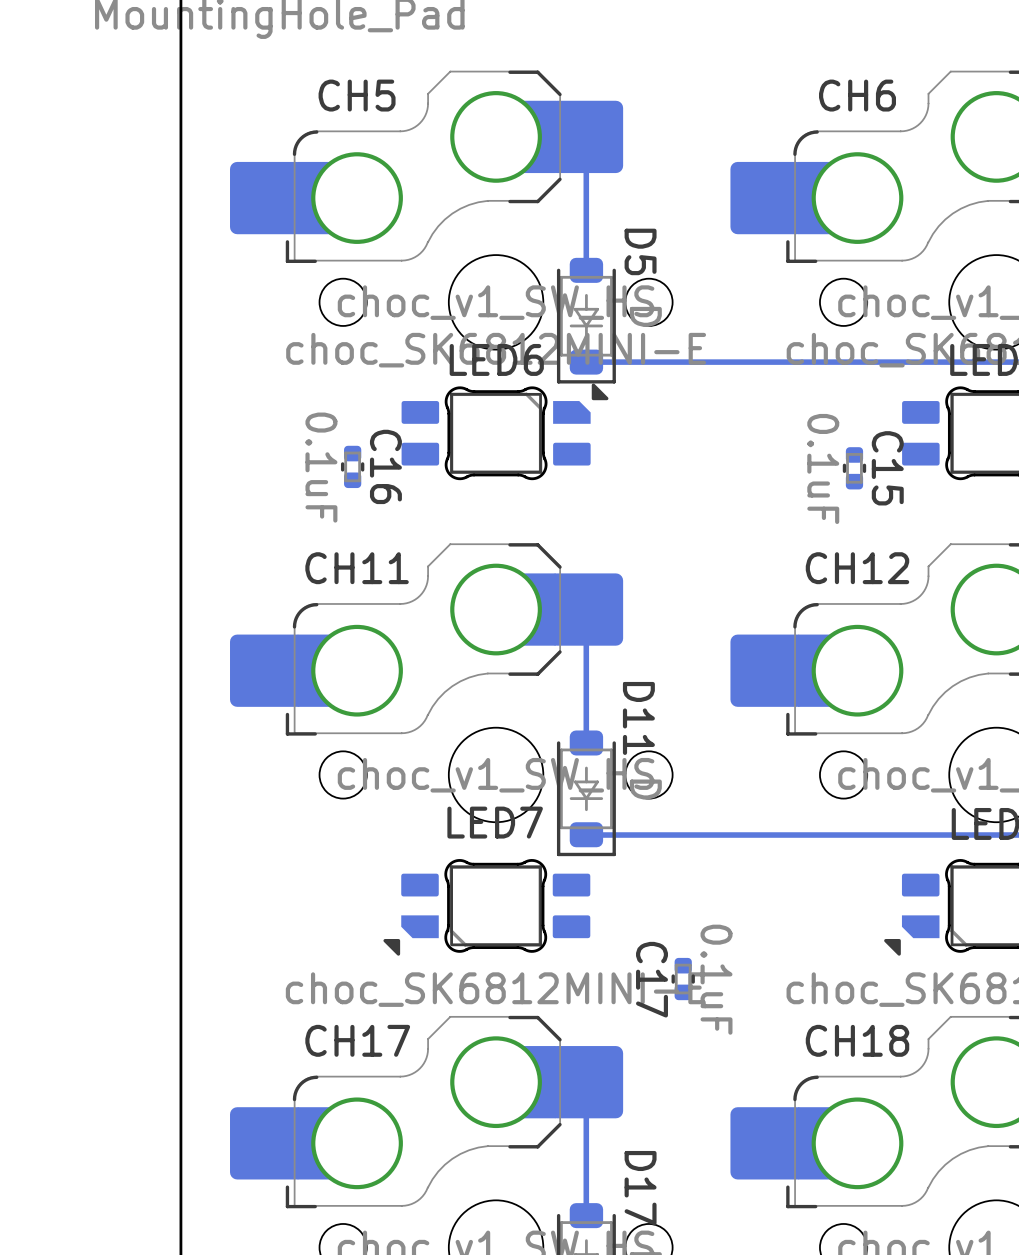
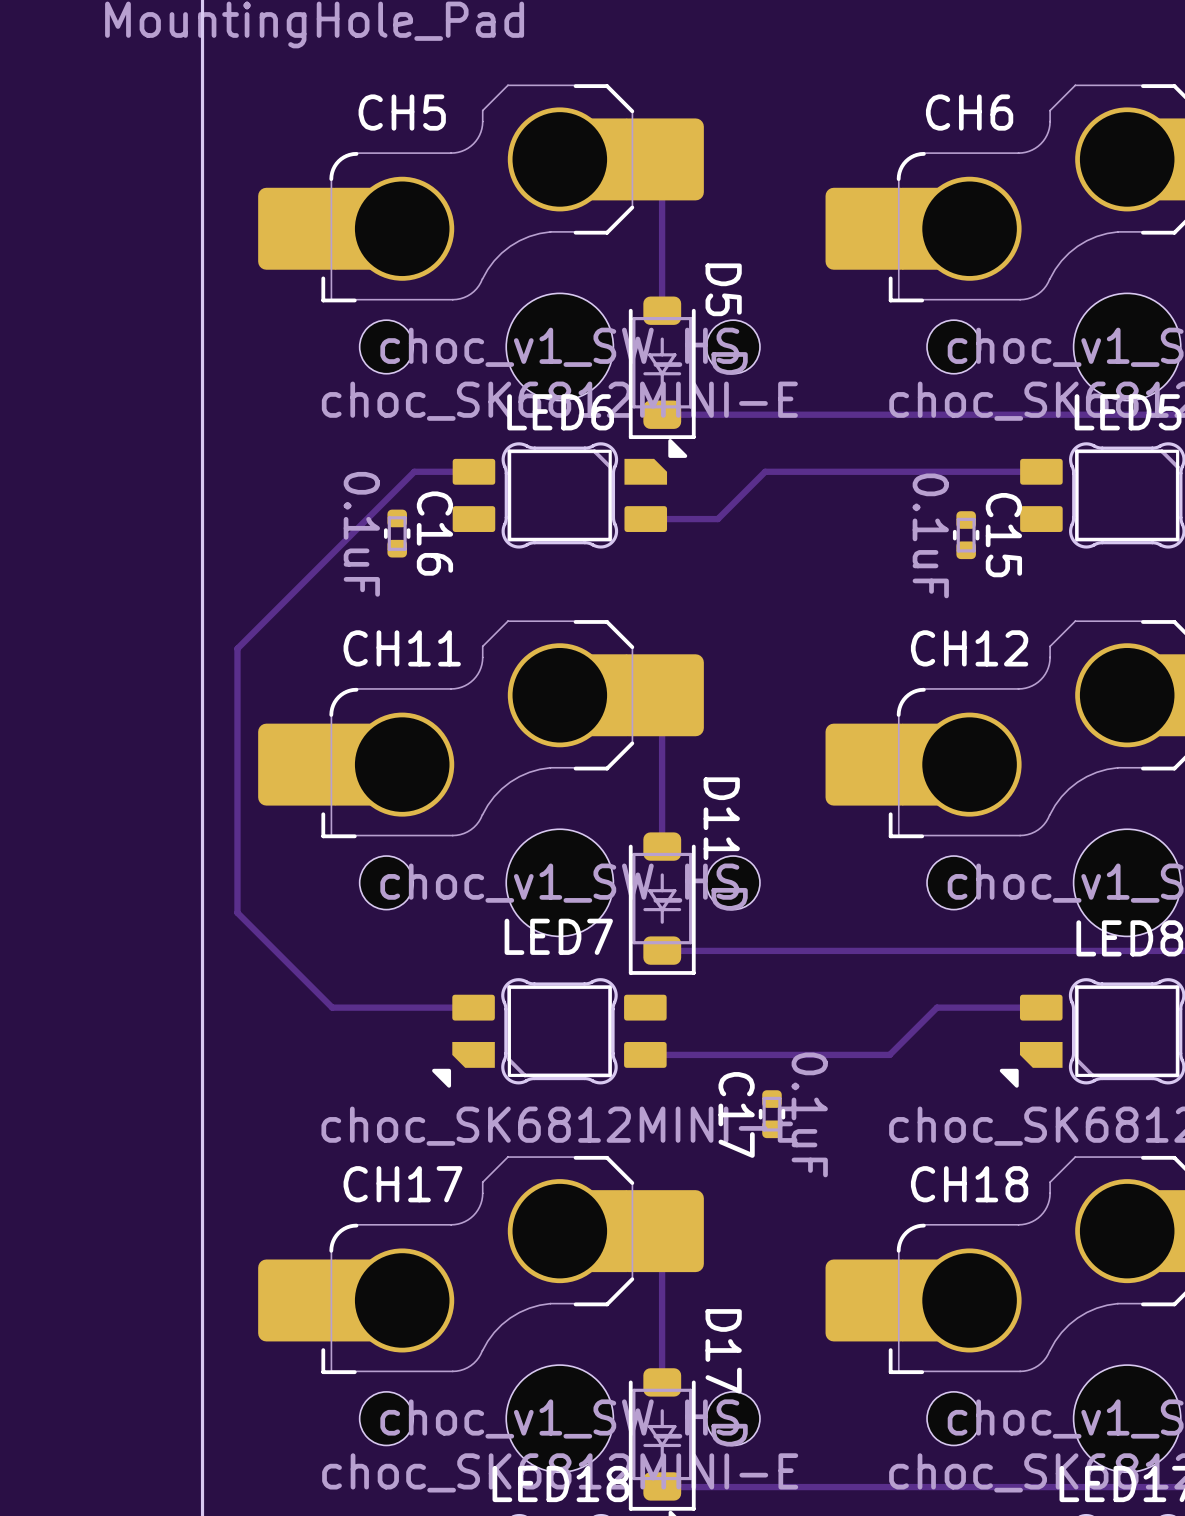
track: none -> (473, 471) (414, 471) (237, 648) (237, 912) (332, 1007) (473, 1007)
track: none -> (1041, 471) (765, 471) (717, 519) (645, 519)
track: none -> (1041, 1007) (936, 1007) (889, 1054) (645, 1054)

